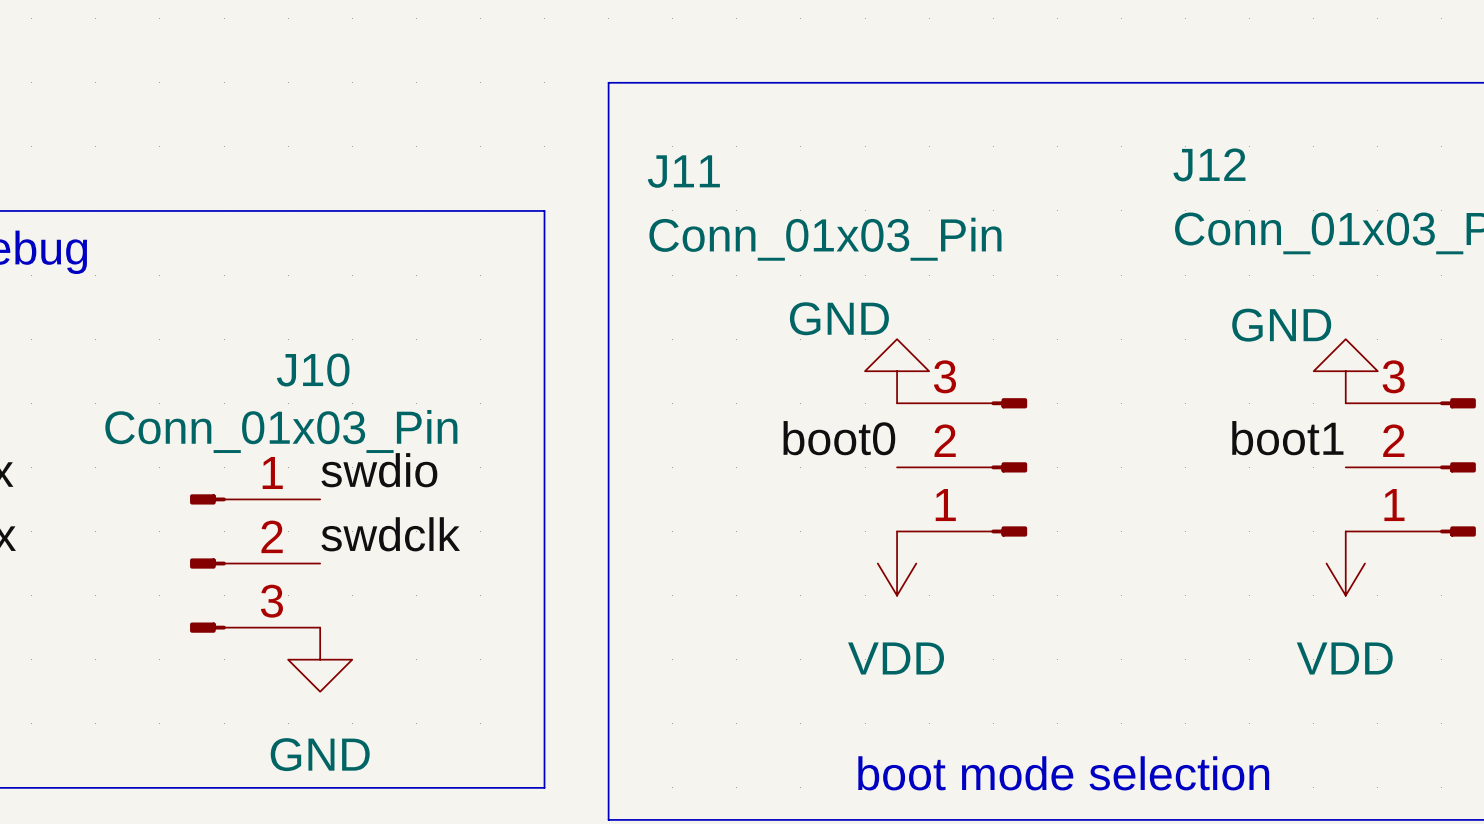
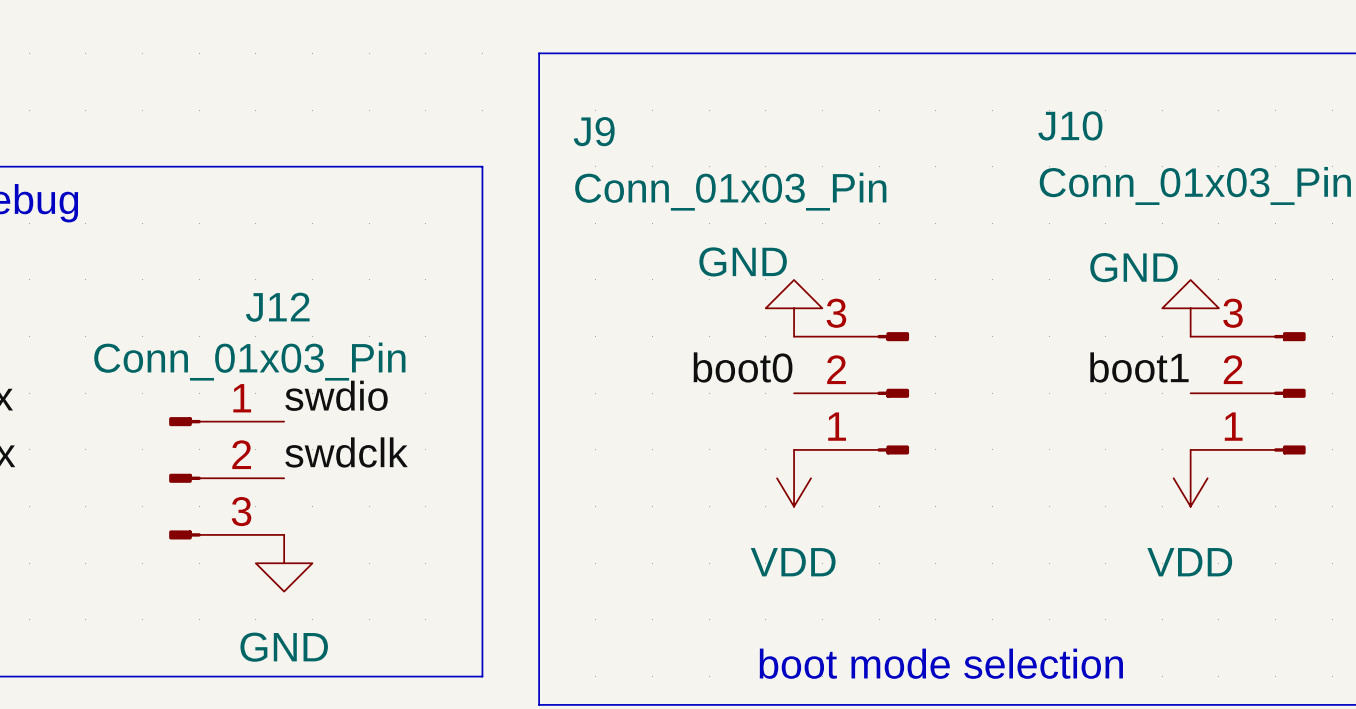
J12 name: J12 (1209, 164) -> J10 (1070, 125)
J11 name: J11 (683, 171) -> J9 (594, 131)
J10 name: J10 (313, 370) -> J12 (277, 307)

